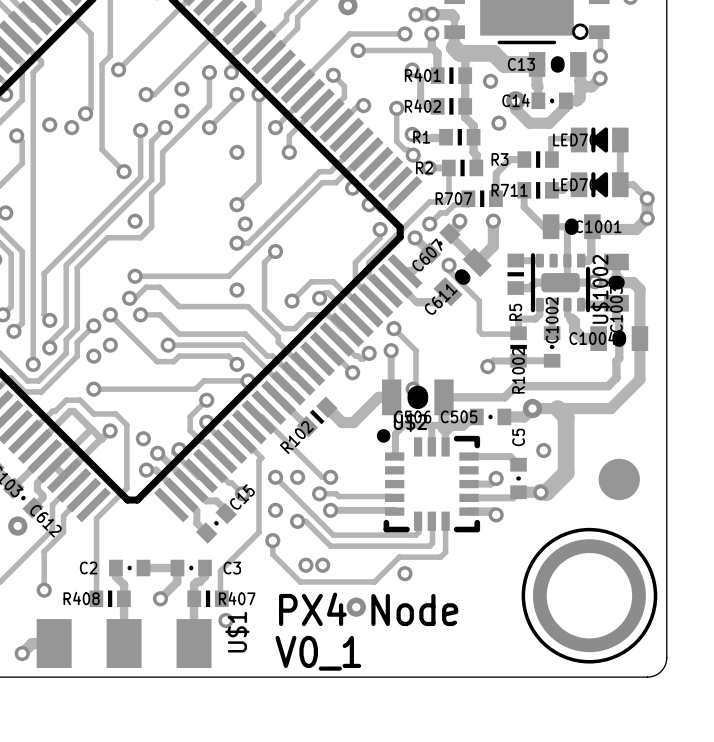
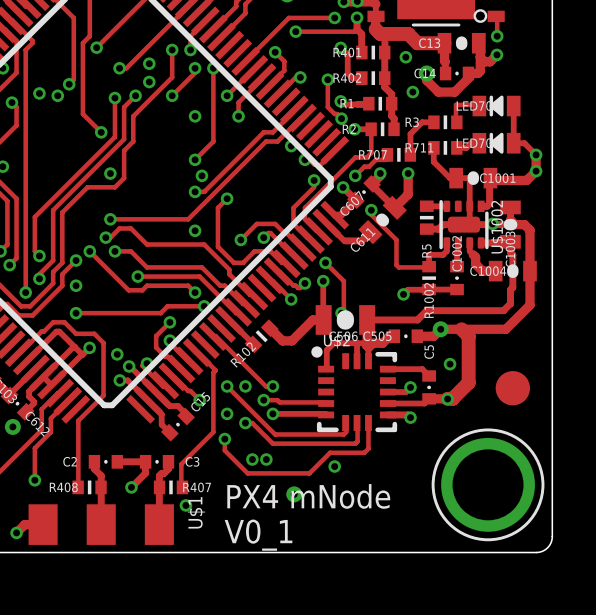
via: (110, 345) -> none
text: PX4 Node (368, 609) -> PX4 mNode (308, 496)

